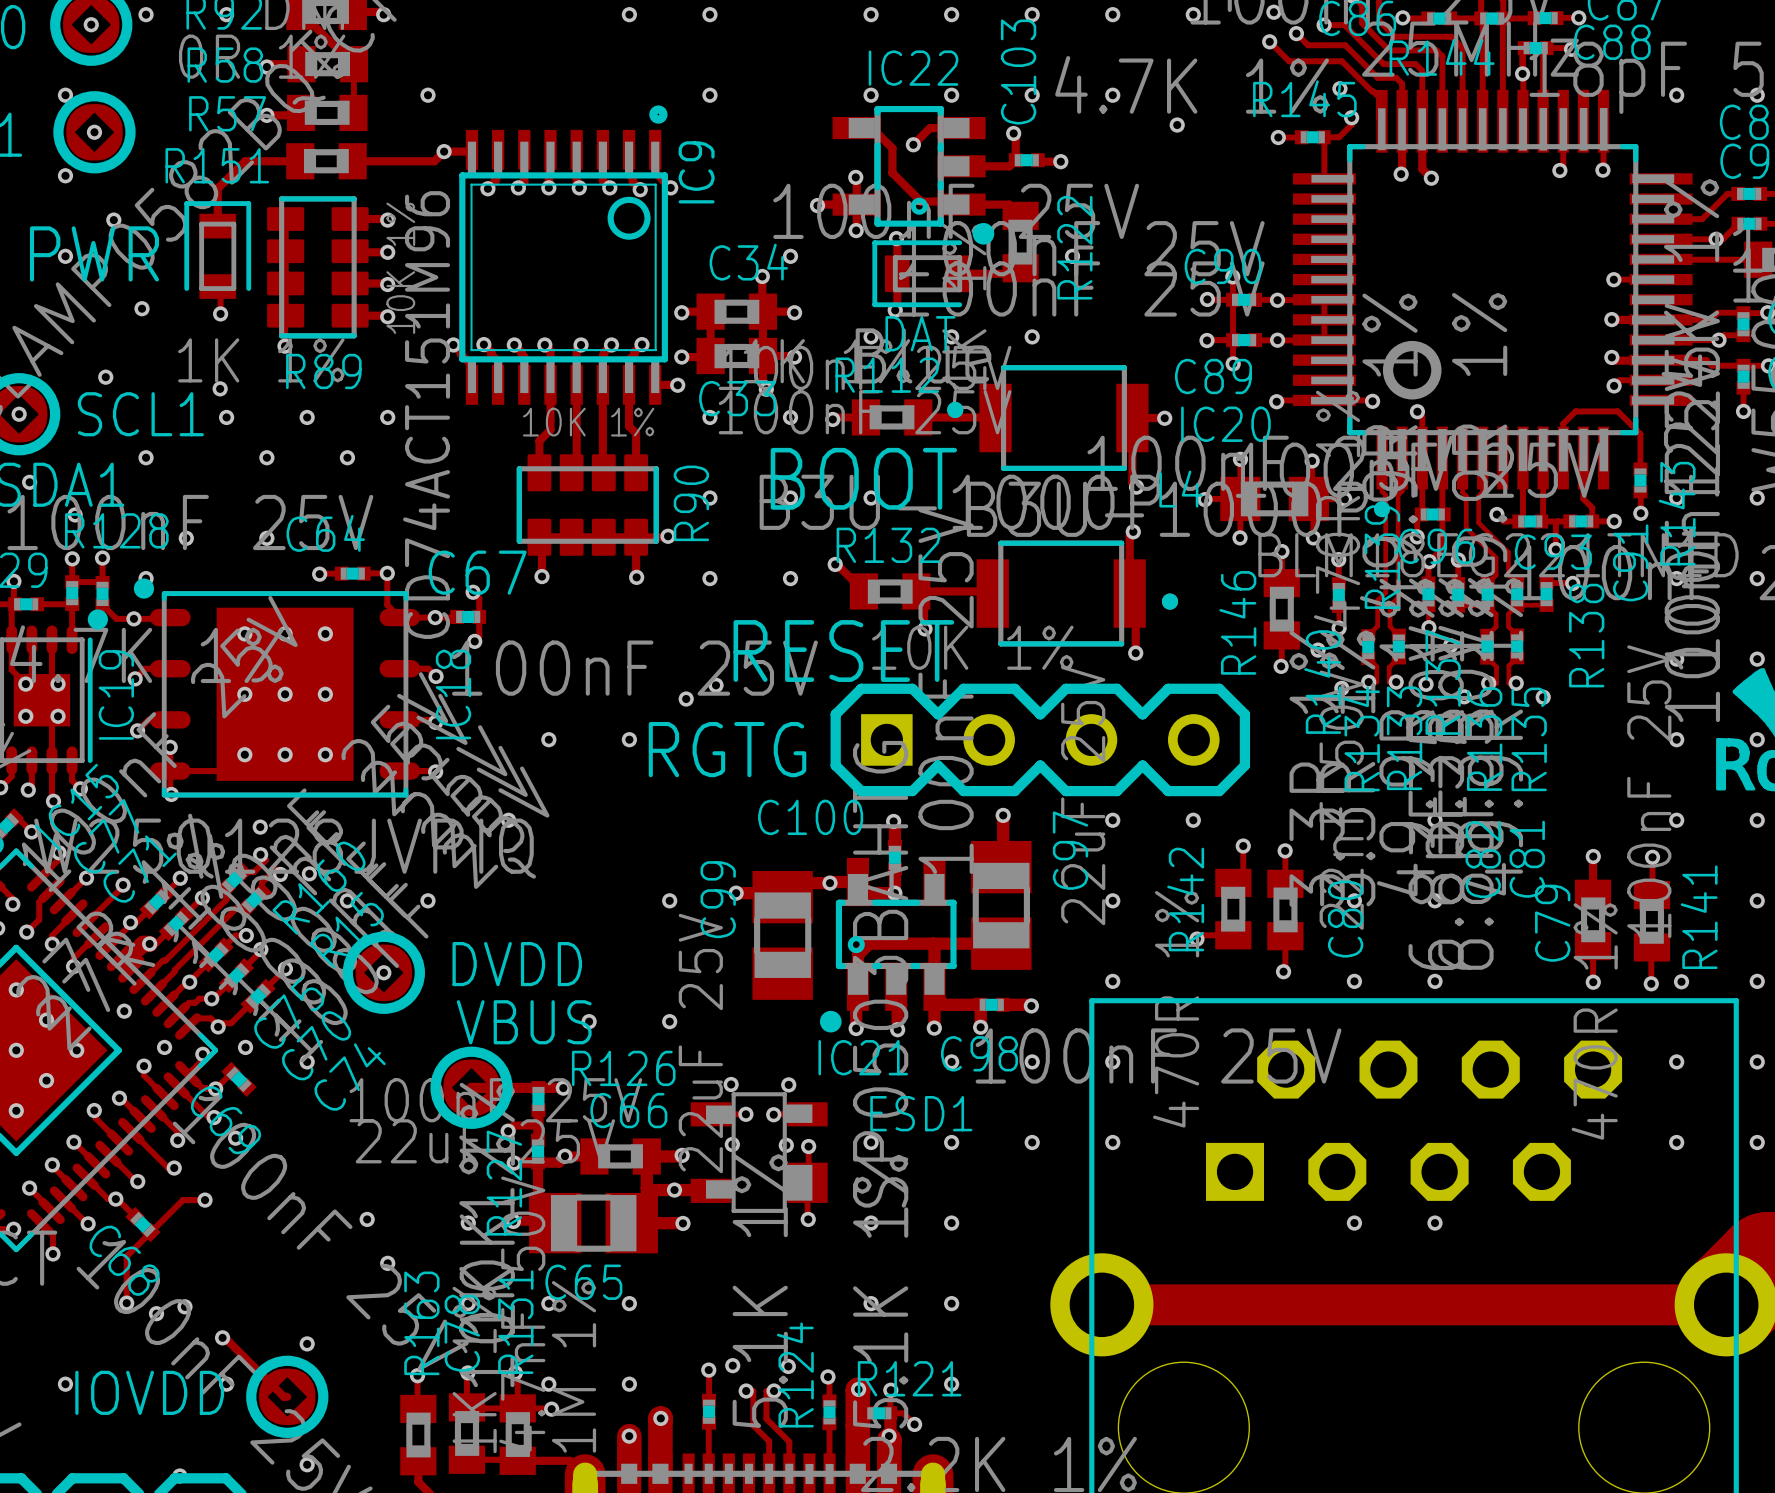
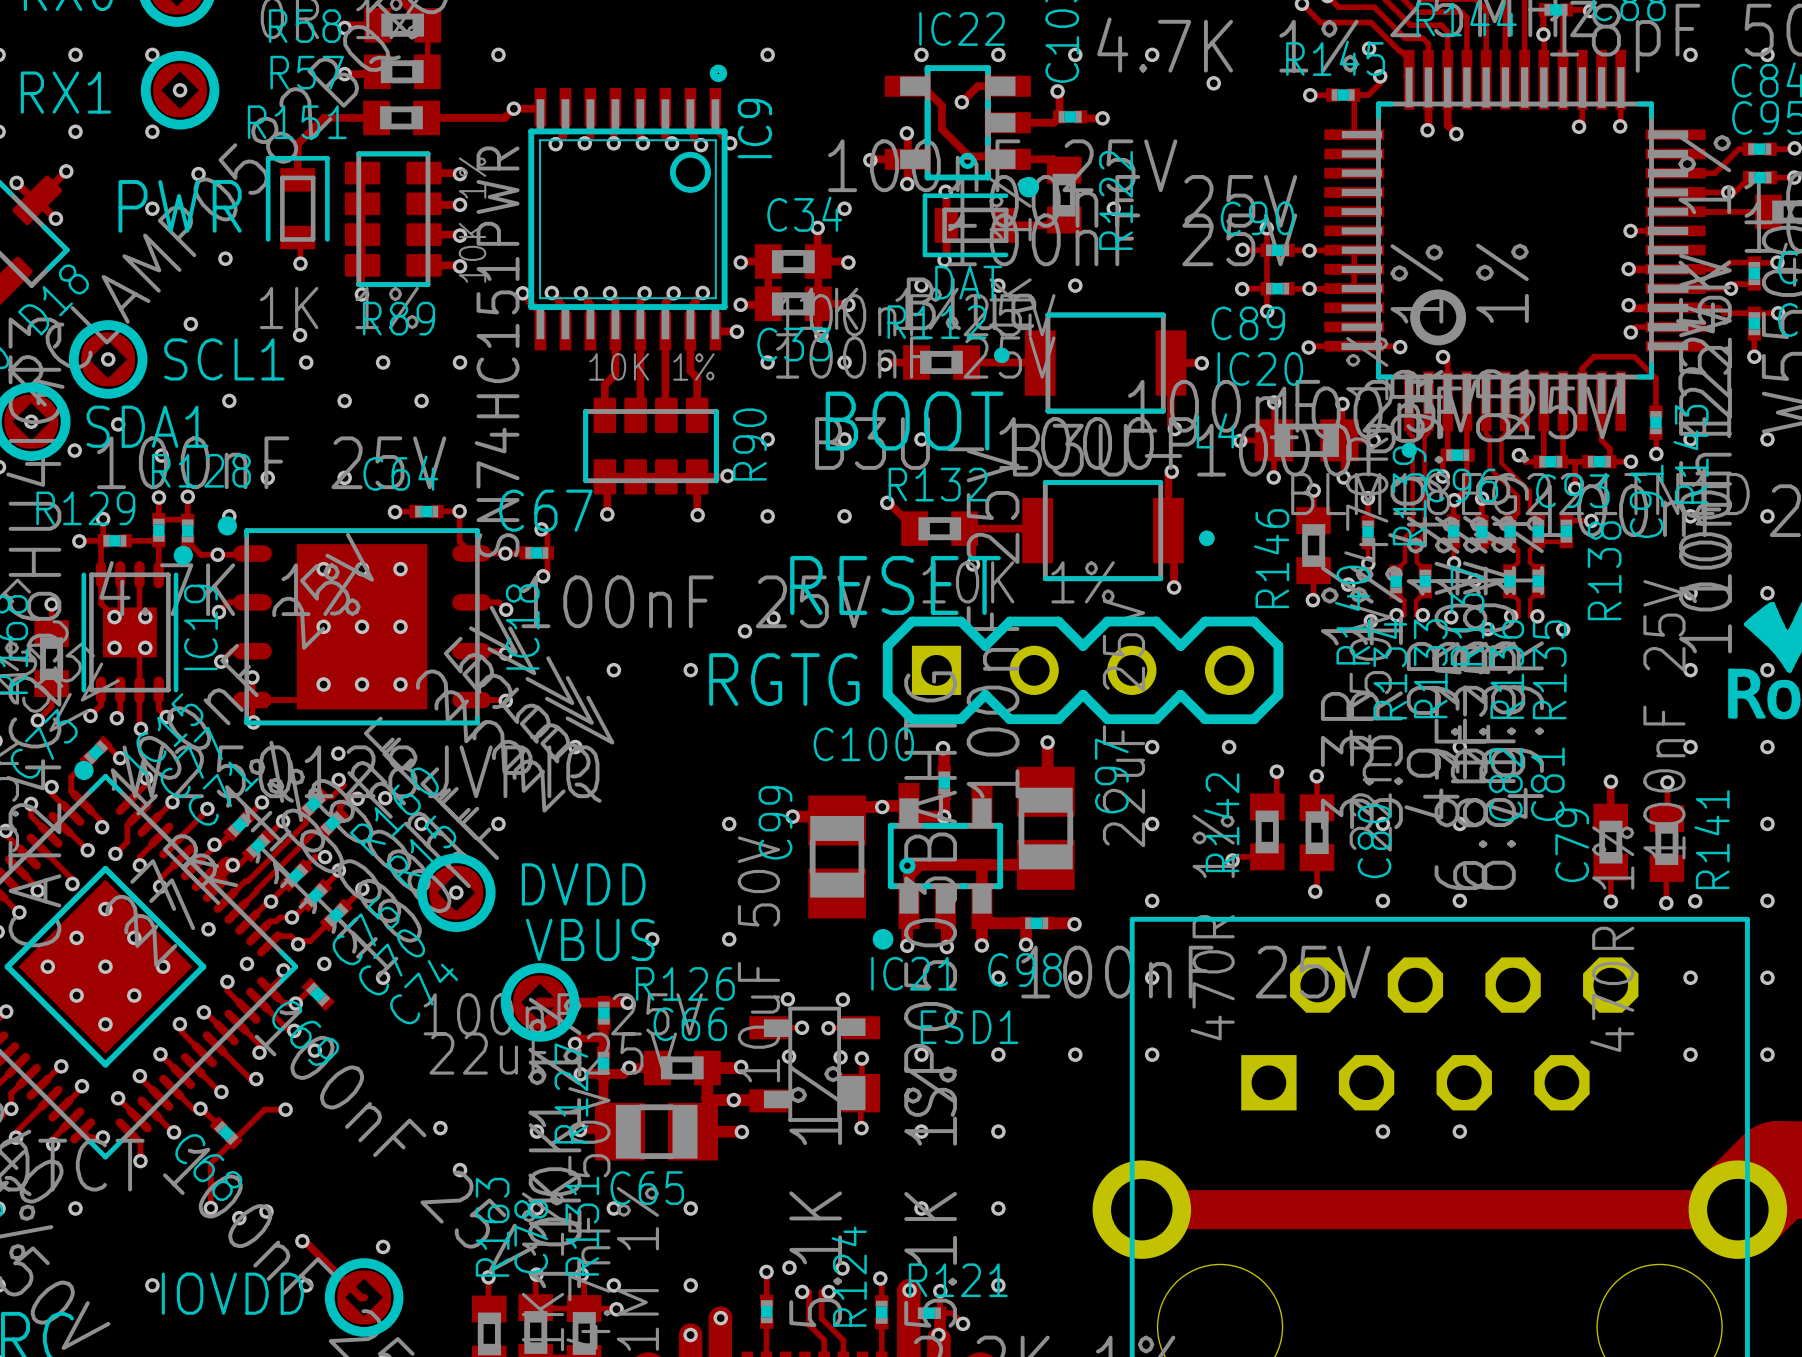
IC9 value: CD74ACT151M96 (426, 415) -> SN74HC151PWR (497, 351)
C99 value: 22uF 25V (700, 1043) -> 10uF 50V (758, 959)

